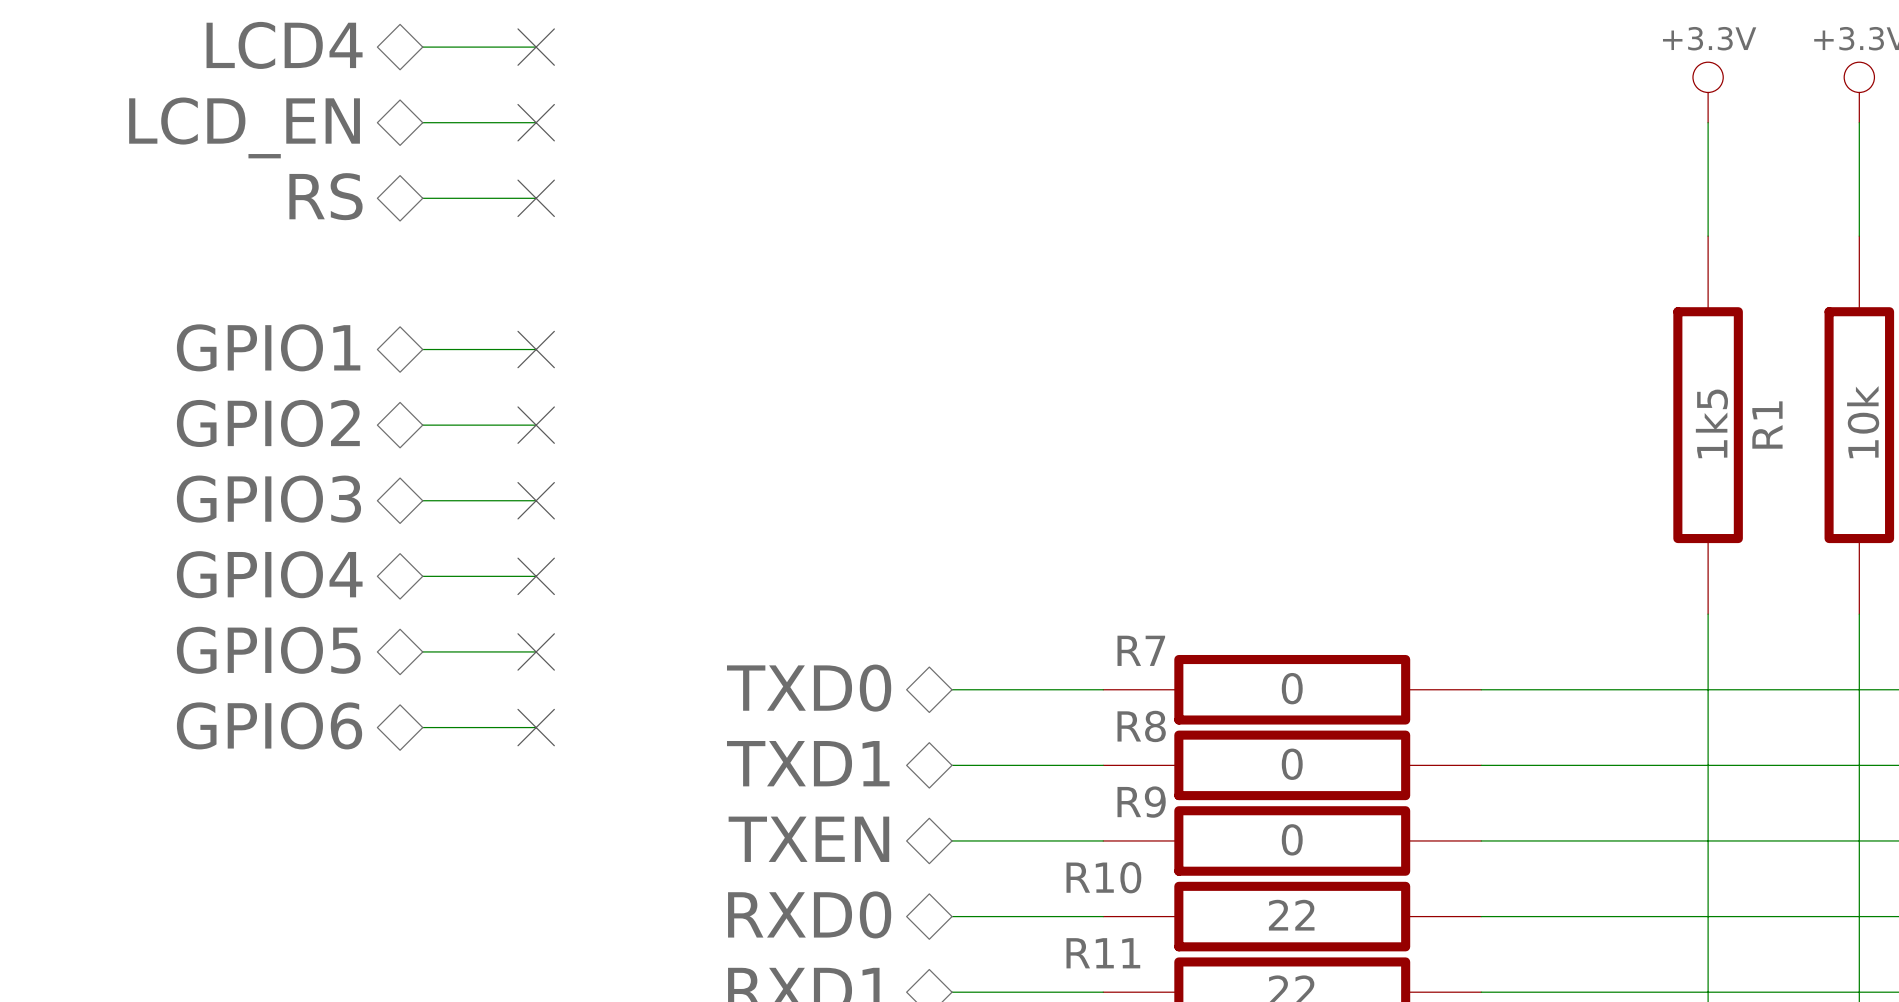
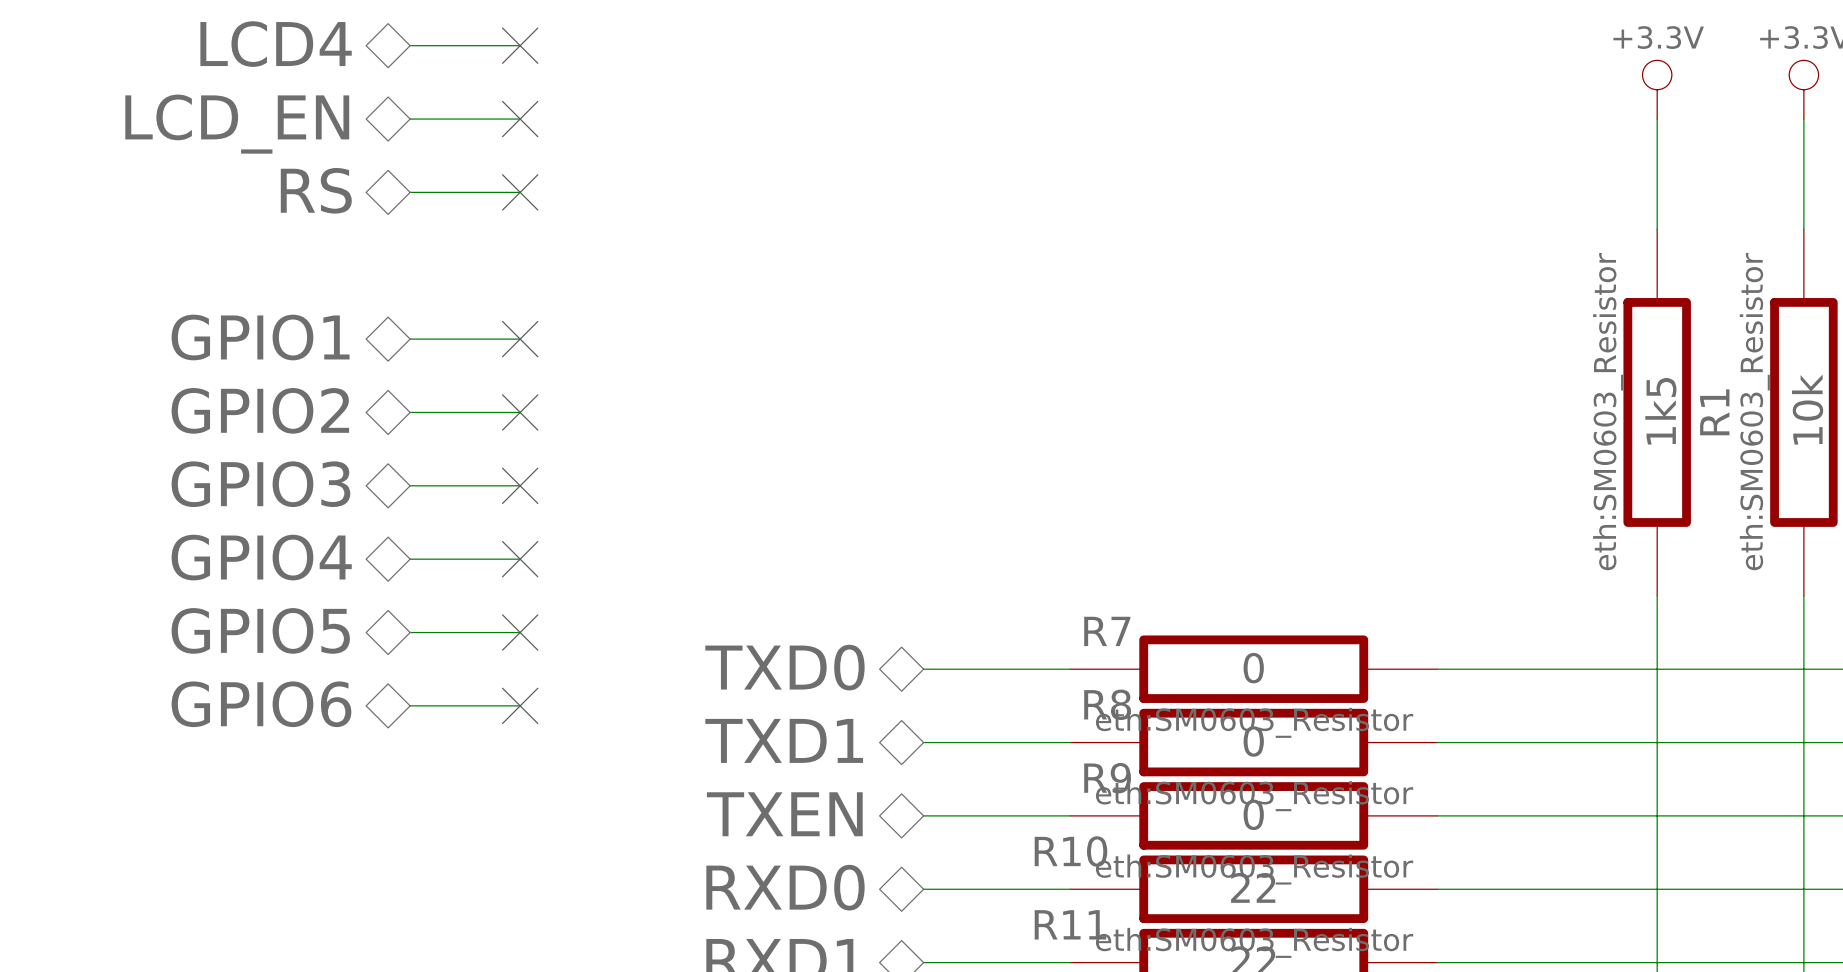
R1 text: none -> eth:SM0603_Resistor (1608, 411)
part text: none -> eth:SM0603_Resistor (1754, 411)
R7 text: none -> eth:SM0603_Resistor (1254, 722)
R8 text: none -> eth:SM0603_Resistor (1254, 796)
R9 text: none -> eth:SM0603_Resistor (1254, 869)
R10 text: none -> eth:SM0603_Resistor (1254, 942)

